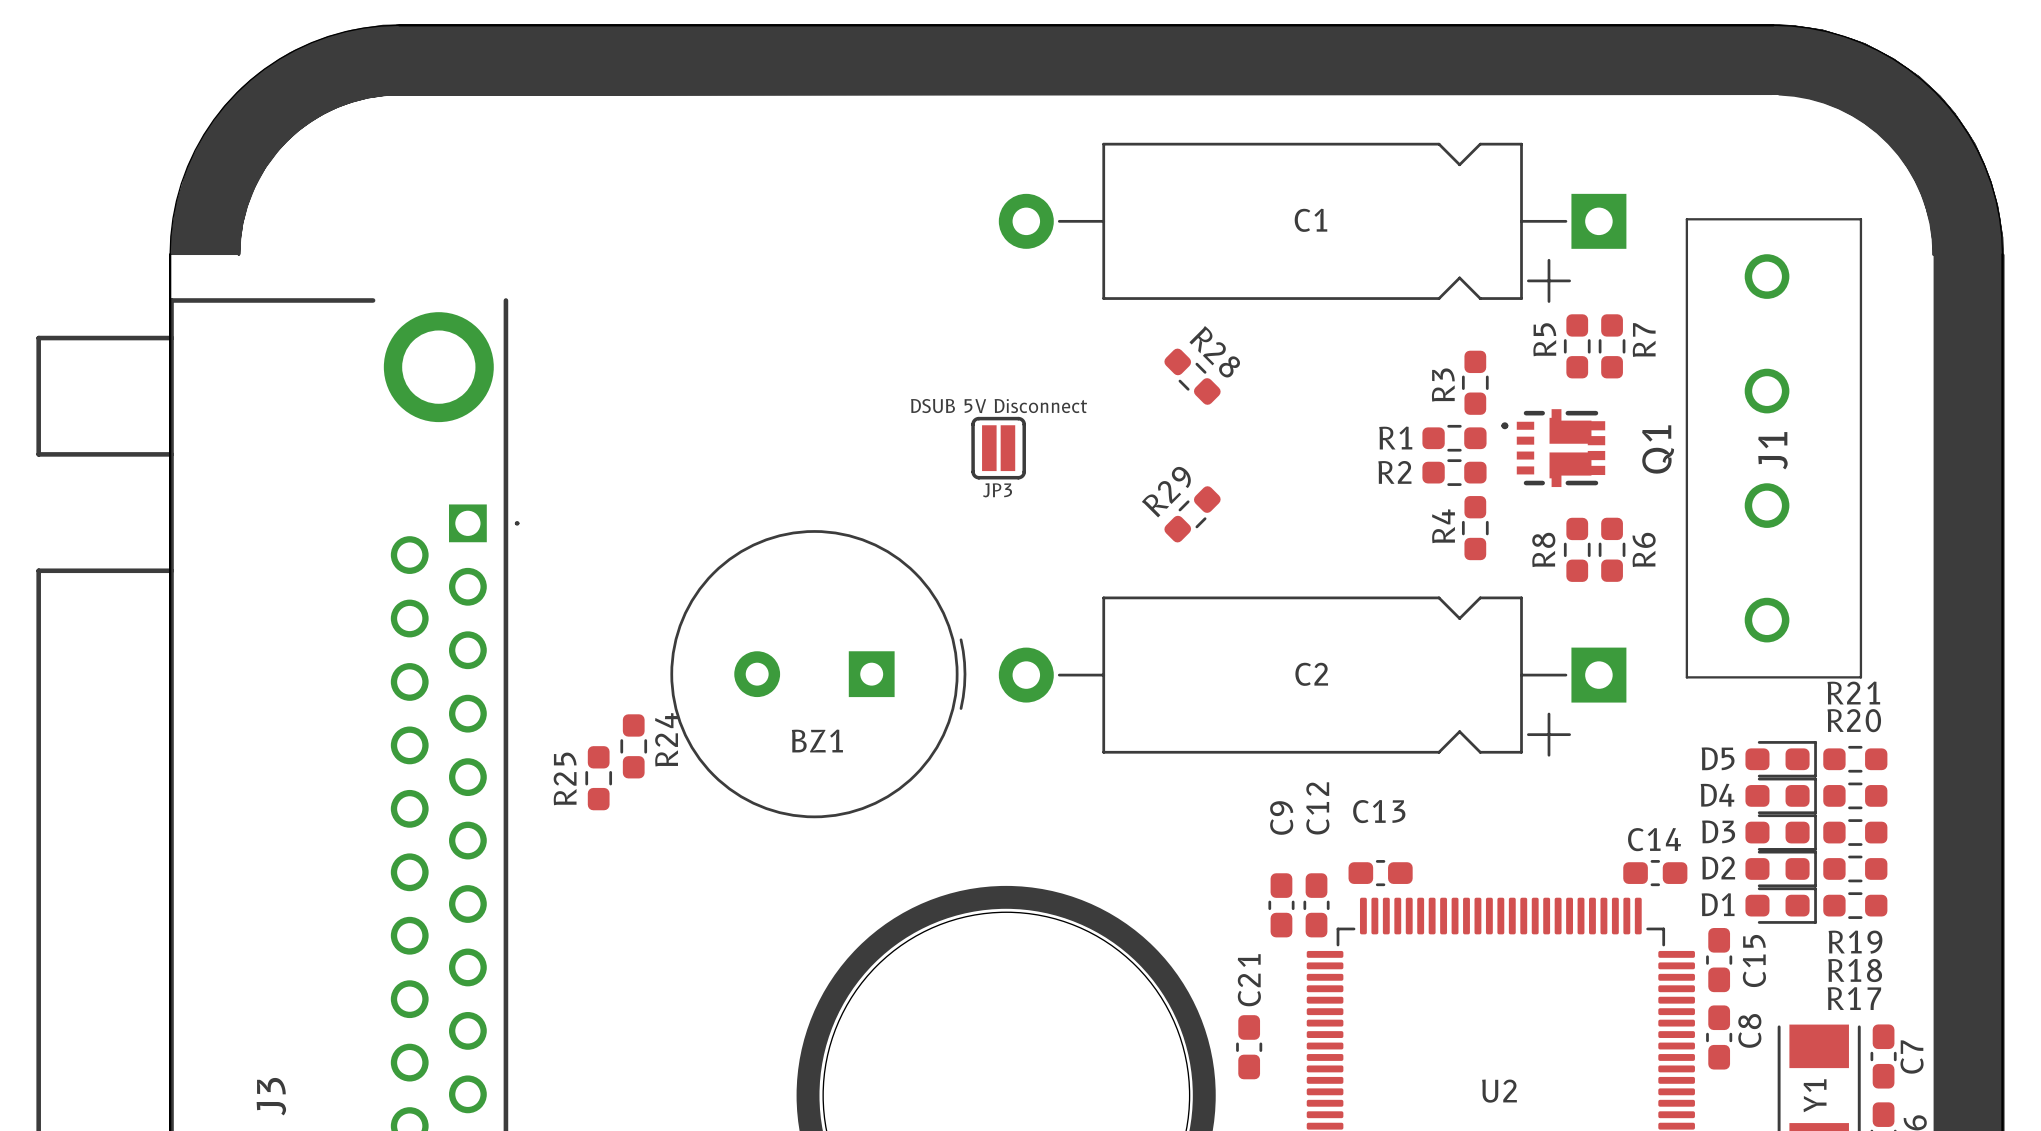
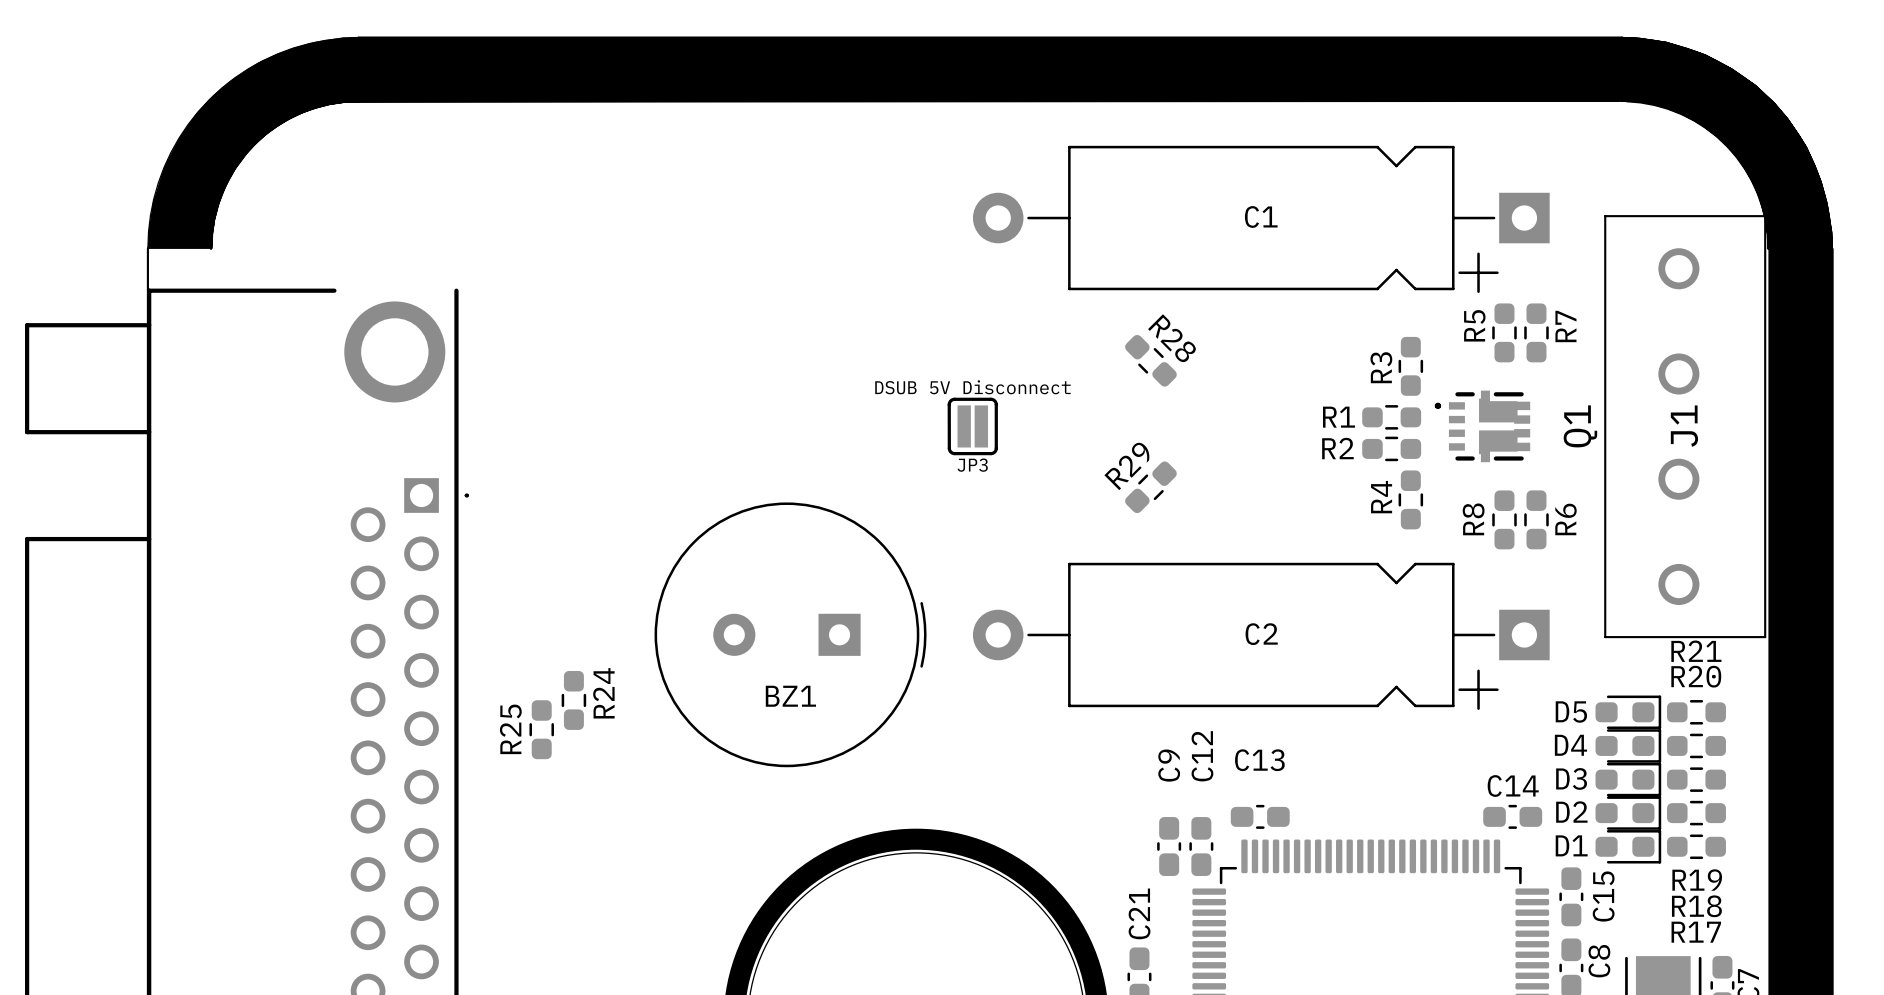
C1 footprint: [998, 142, 1627, 303] -> [972, 145, 1550, 293]
R7 position: (1577, 346) -> (1504, 332)
R5 position: (1612, 346) -> (1536, 332)
R28 position: (1192, 376) -> (1150, 360)
R3 position: (1475, 382) -> (1410, 366)
R1 position: (1454, 438) -> (1391, 417)
JP3 position: (998, 448) -> (972, 426)
Q1 position: (1553, 448) -> (1482, 426)
J1 position: (1773, 448) -> (1685, 426)
R2 position: (1454, 472) -> (1391, 448)
R29 position: (1192, 514) -> (1150, 487)
R4 position: (1475, 528) -> (1410, 499)
R8 position: (1577, 549) -> (1504, 519)
R6 position: (1612, 549) -> (1536, 519)
C2 footprint: [998, 596, 1627, 757] -> [972, 562, 1550, 710]
BZ1 position: (818, 674) -> (790, 634)

